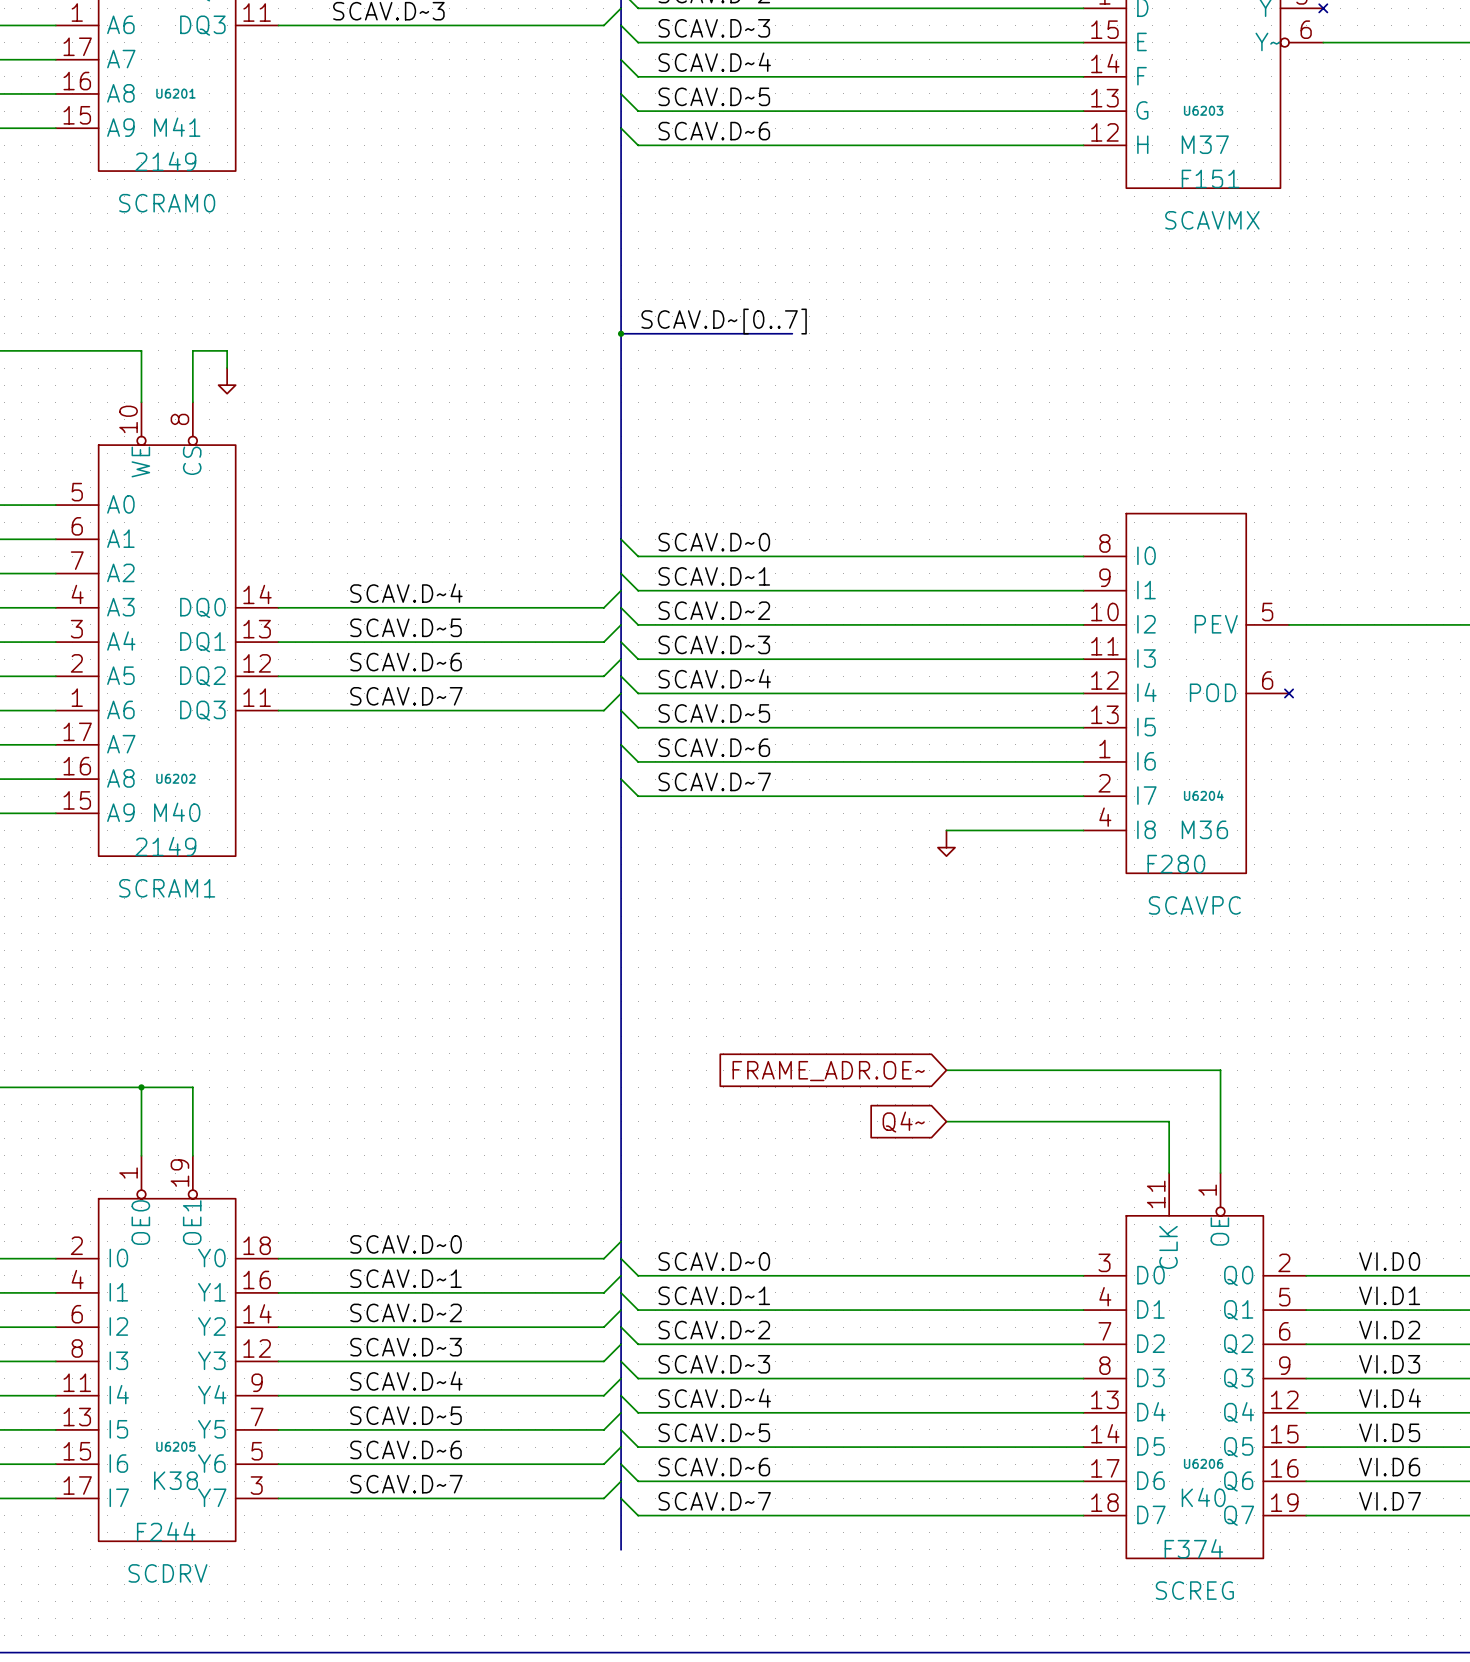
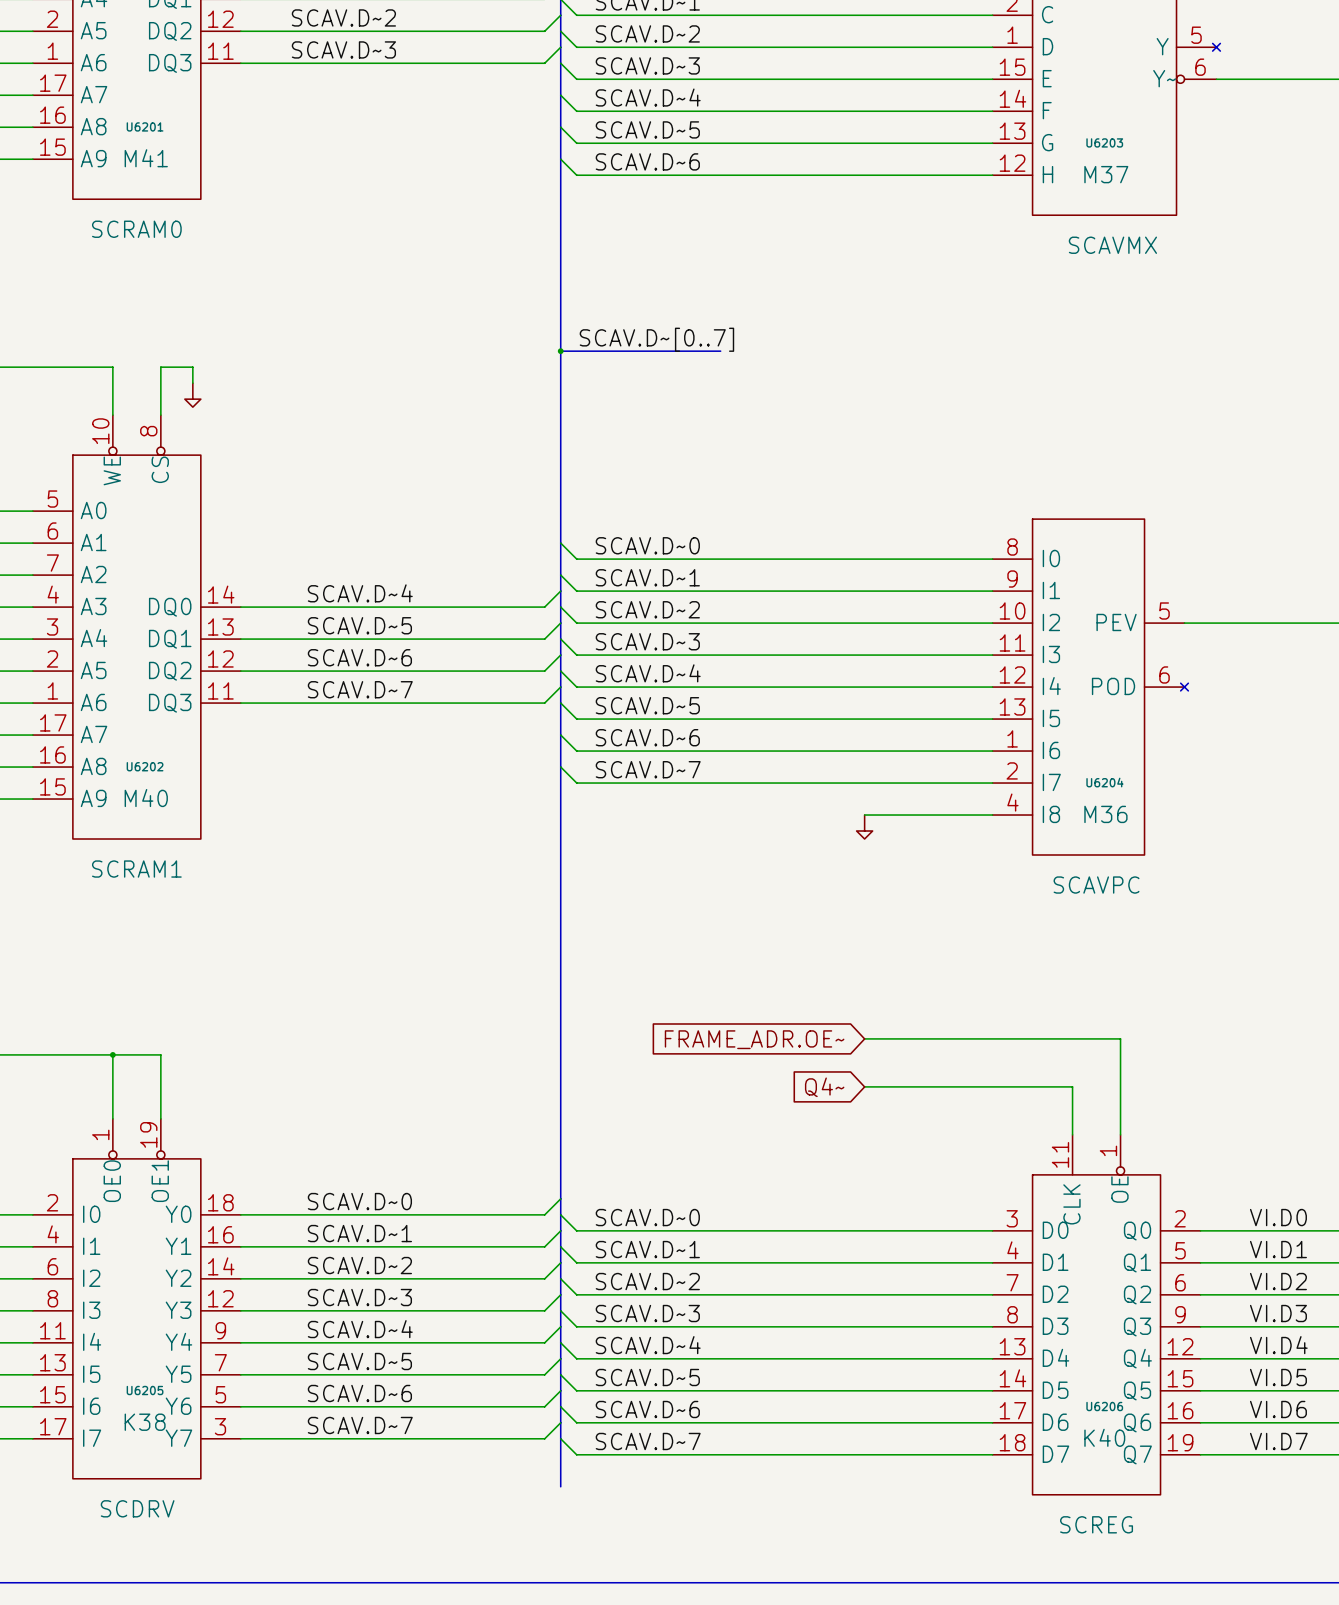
U6201 value: 2149 (165, 161) -> none
U6203 value: F151 (1210, 178) -> none
U6202 value: 2149 (165, 846) -> none
U6204 value: F280 (1176, 864) -> none
U6205 value: F244 (166, 1531) -> none
U6206 value: F374 (1193, 1548) -> none

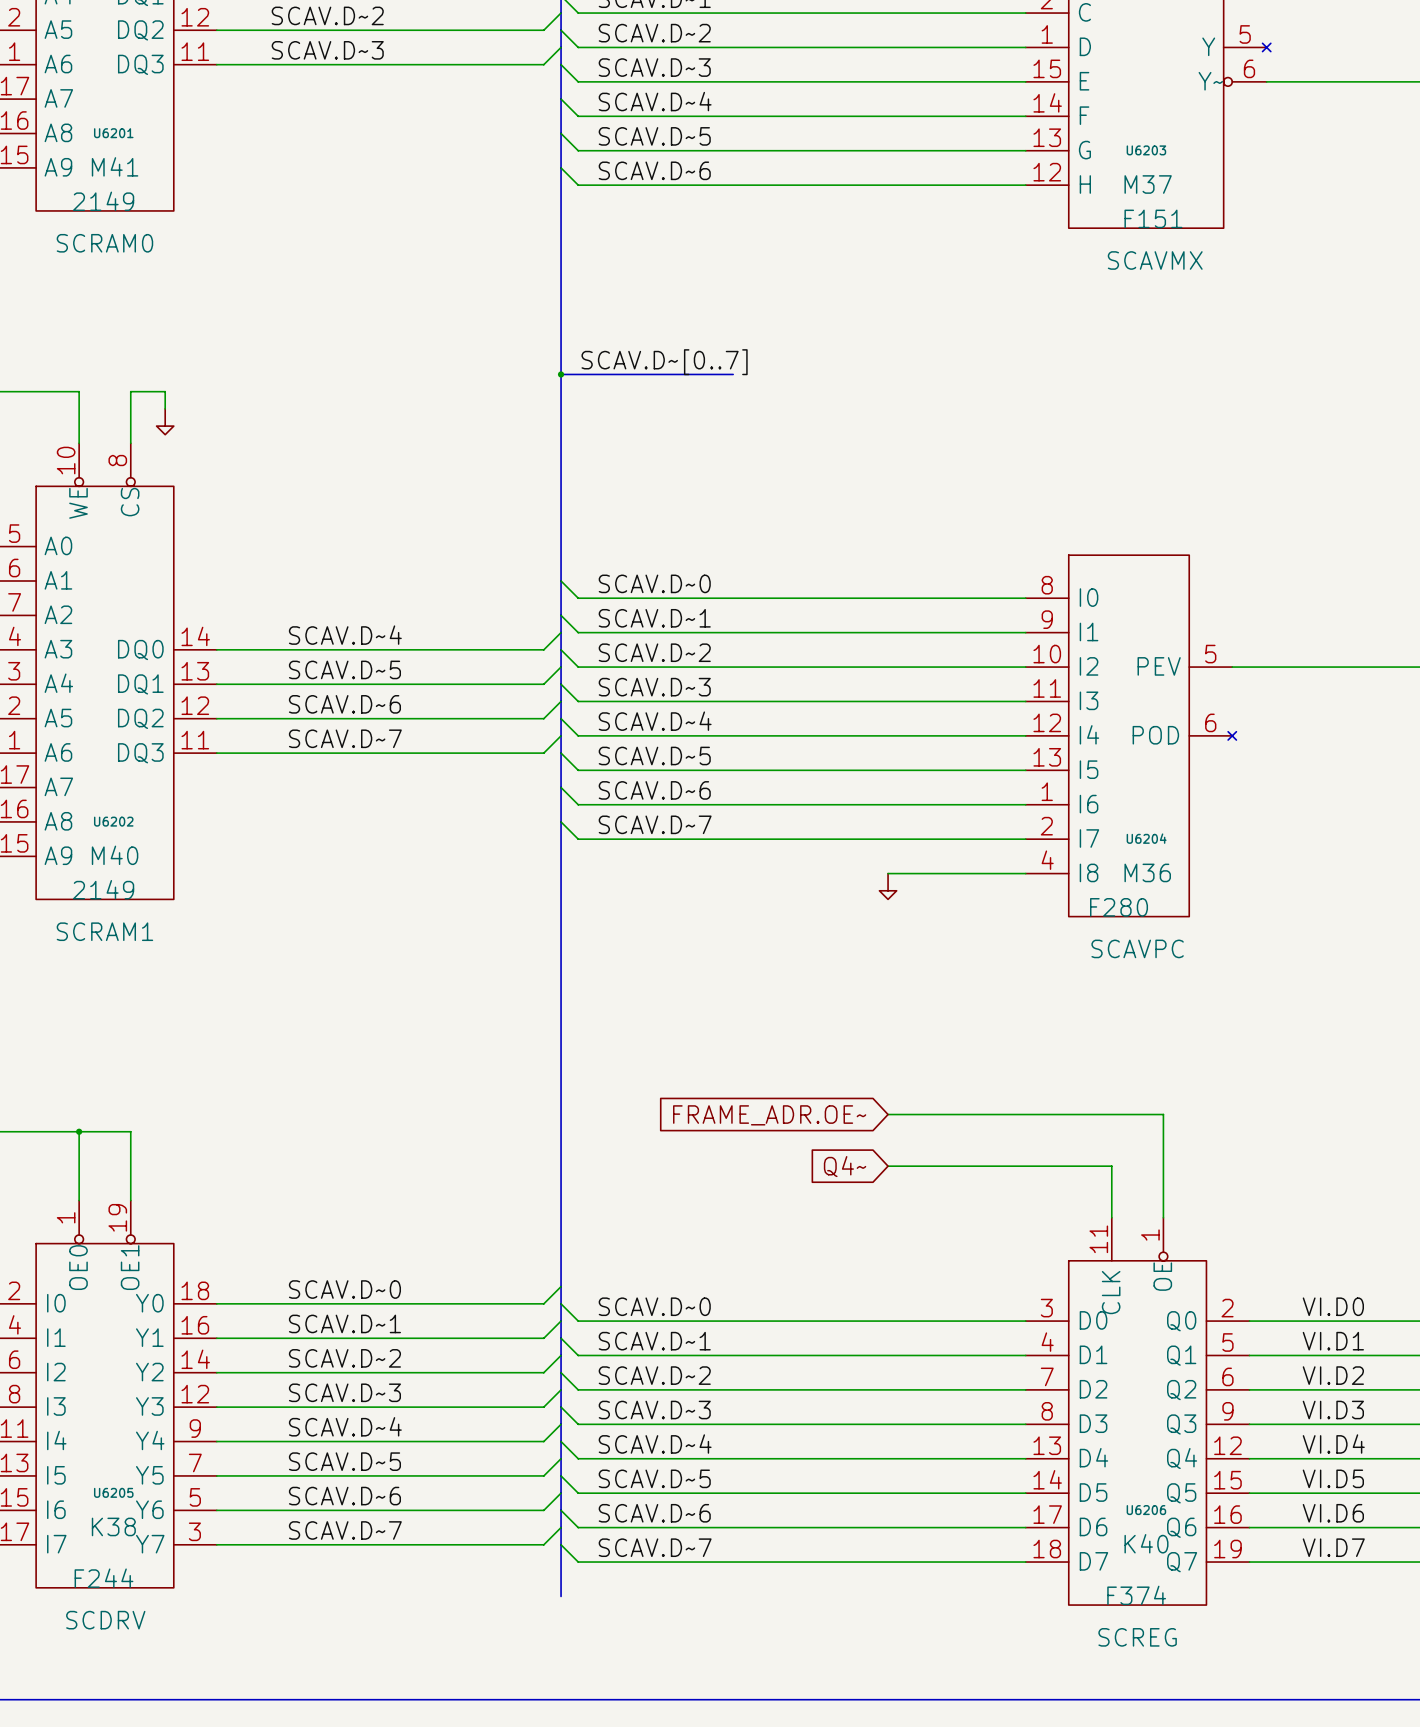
U6201 value: none -> 2149 (103, 201)
U6203 value: none -> F151 (1153, 218)
U6202 value: none -> 2149 (103, 889)
U6204 value: none -> F280 (1119, 907)
U6205 value: none -> F244 (103, 1578)
U6206 value: none -> F374 (1136, 1595)

